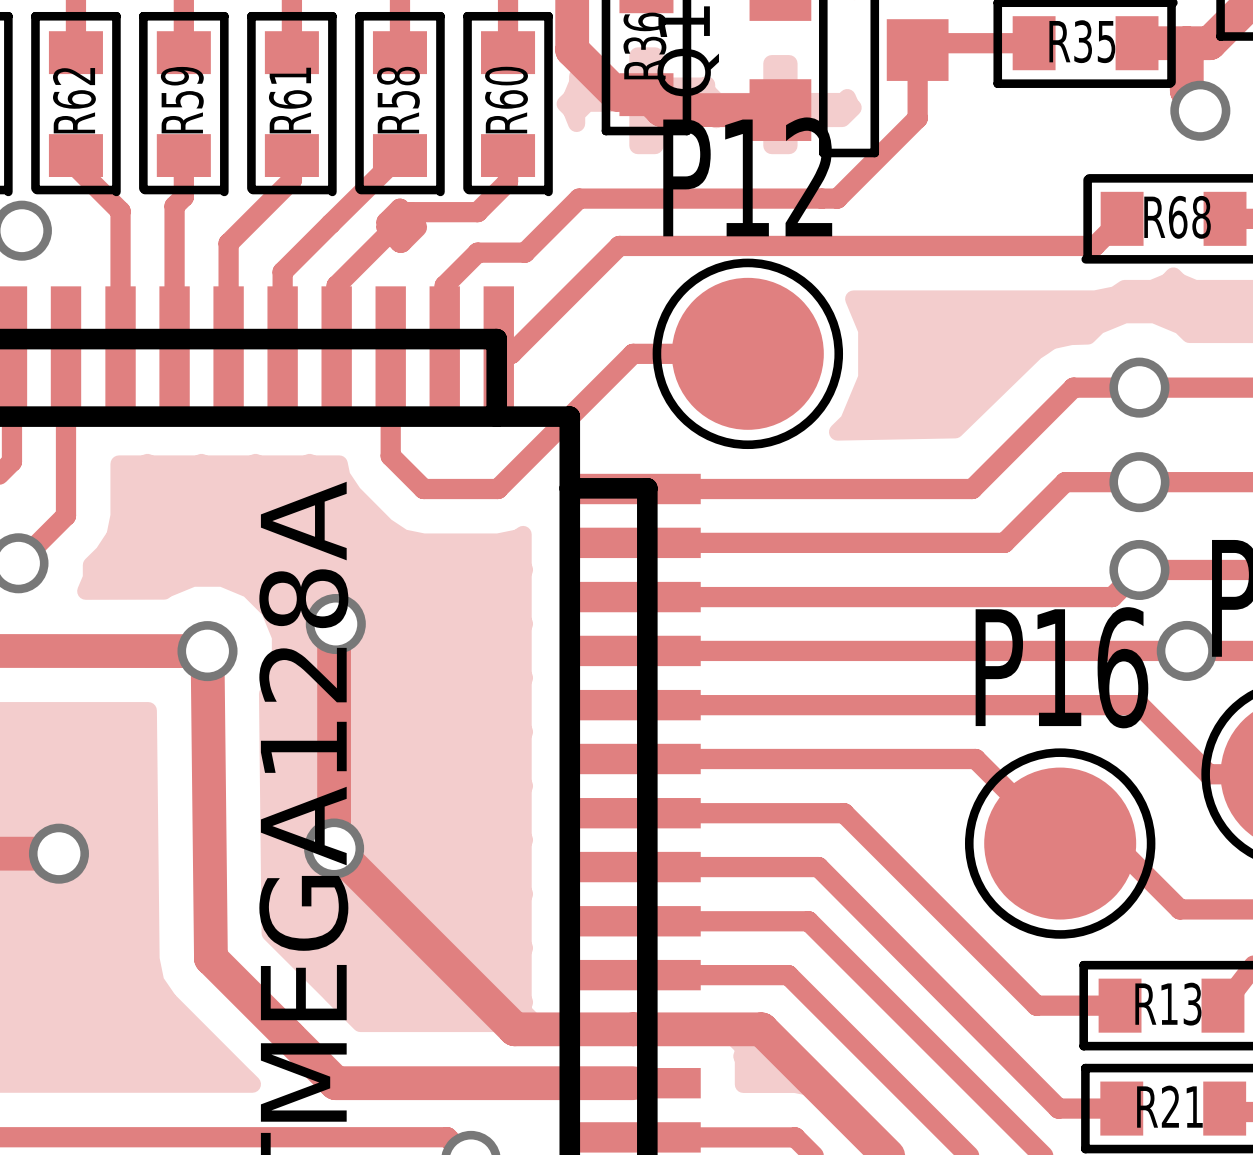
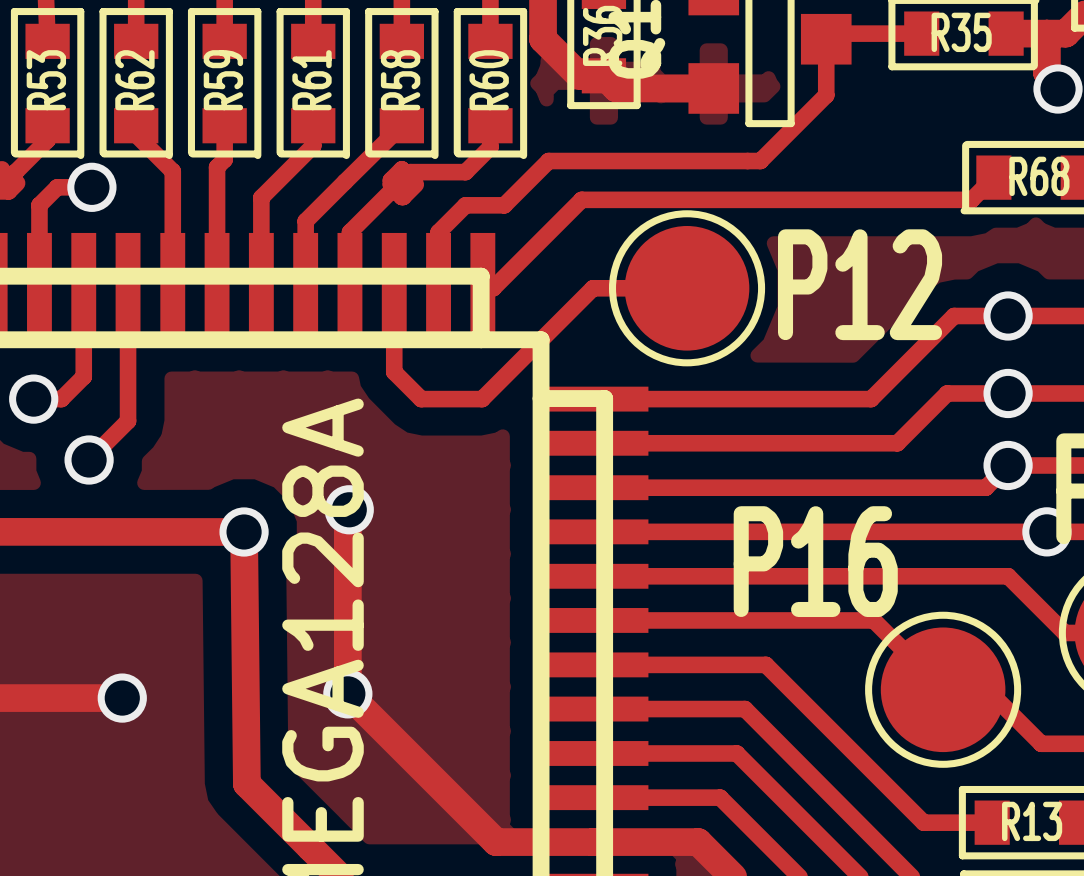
P12 name position: P12 (747, 176) -> P12 (860, 284)
P16 name position: P16 (1061, 667) -> P16 (815, 561)

